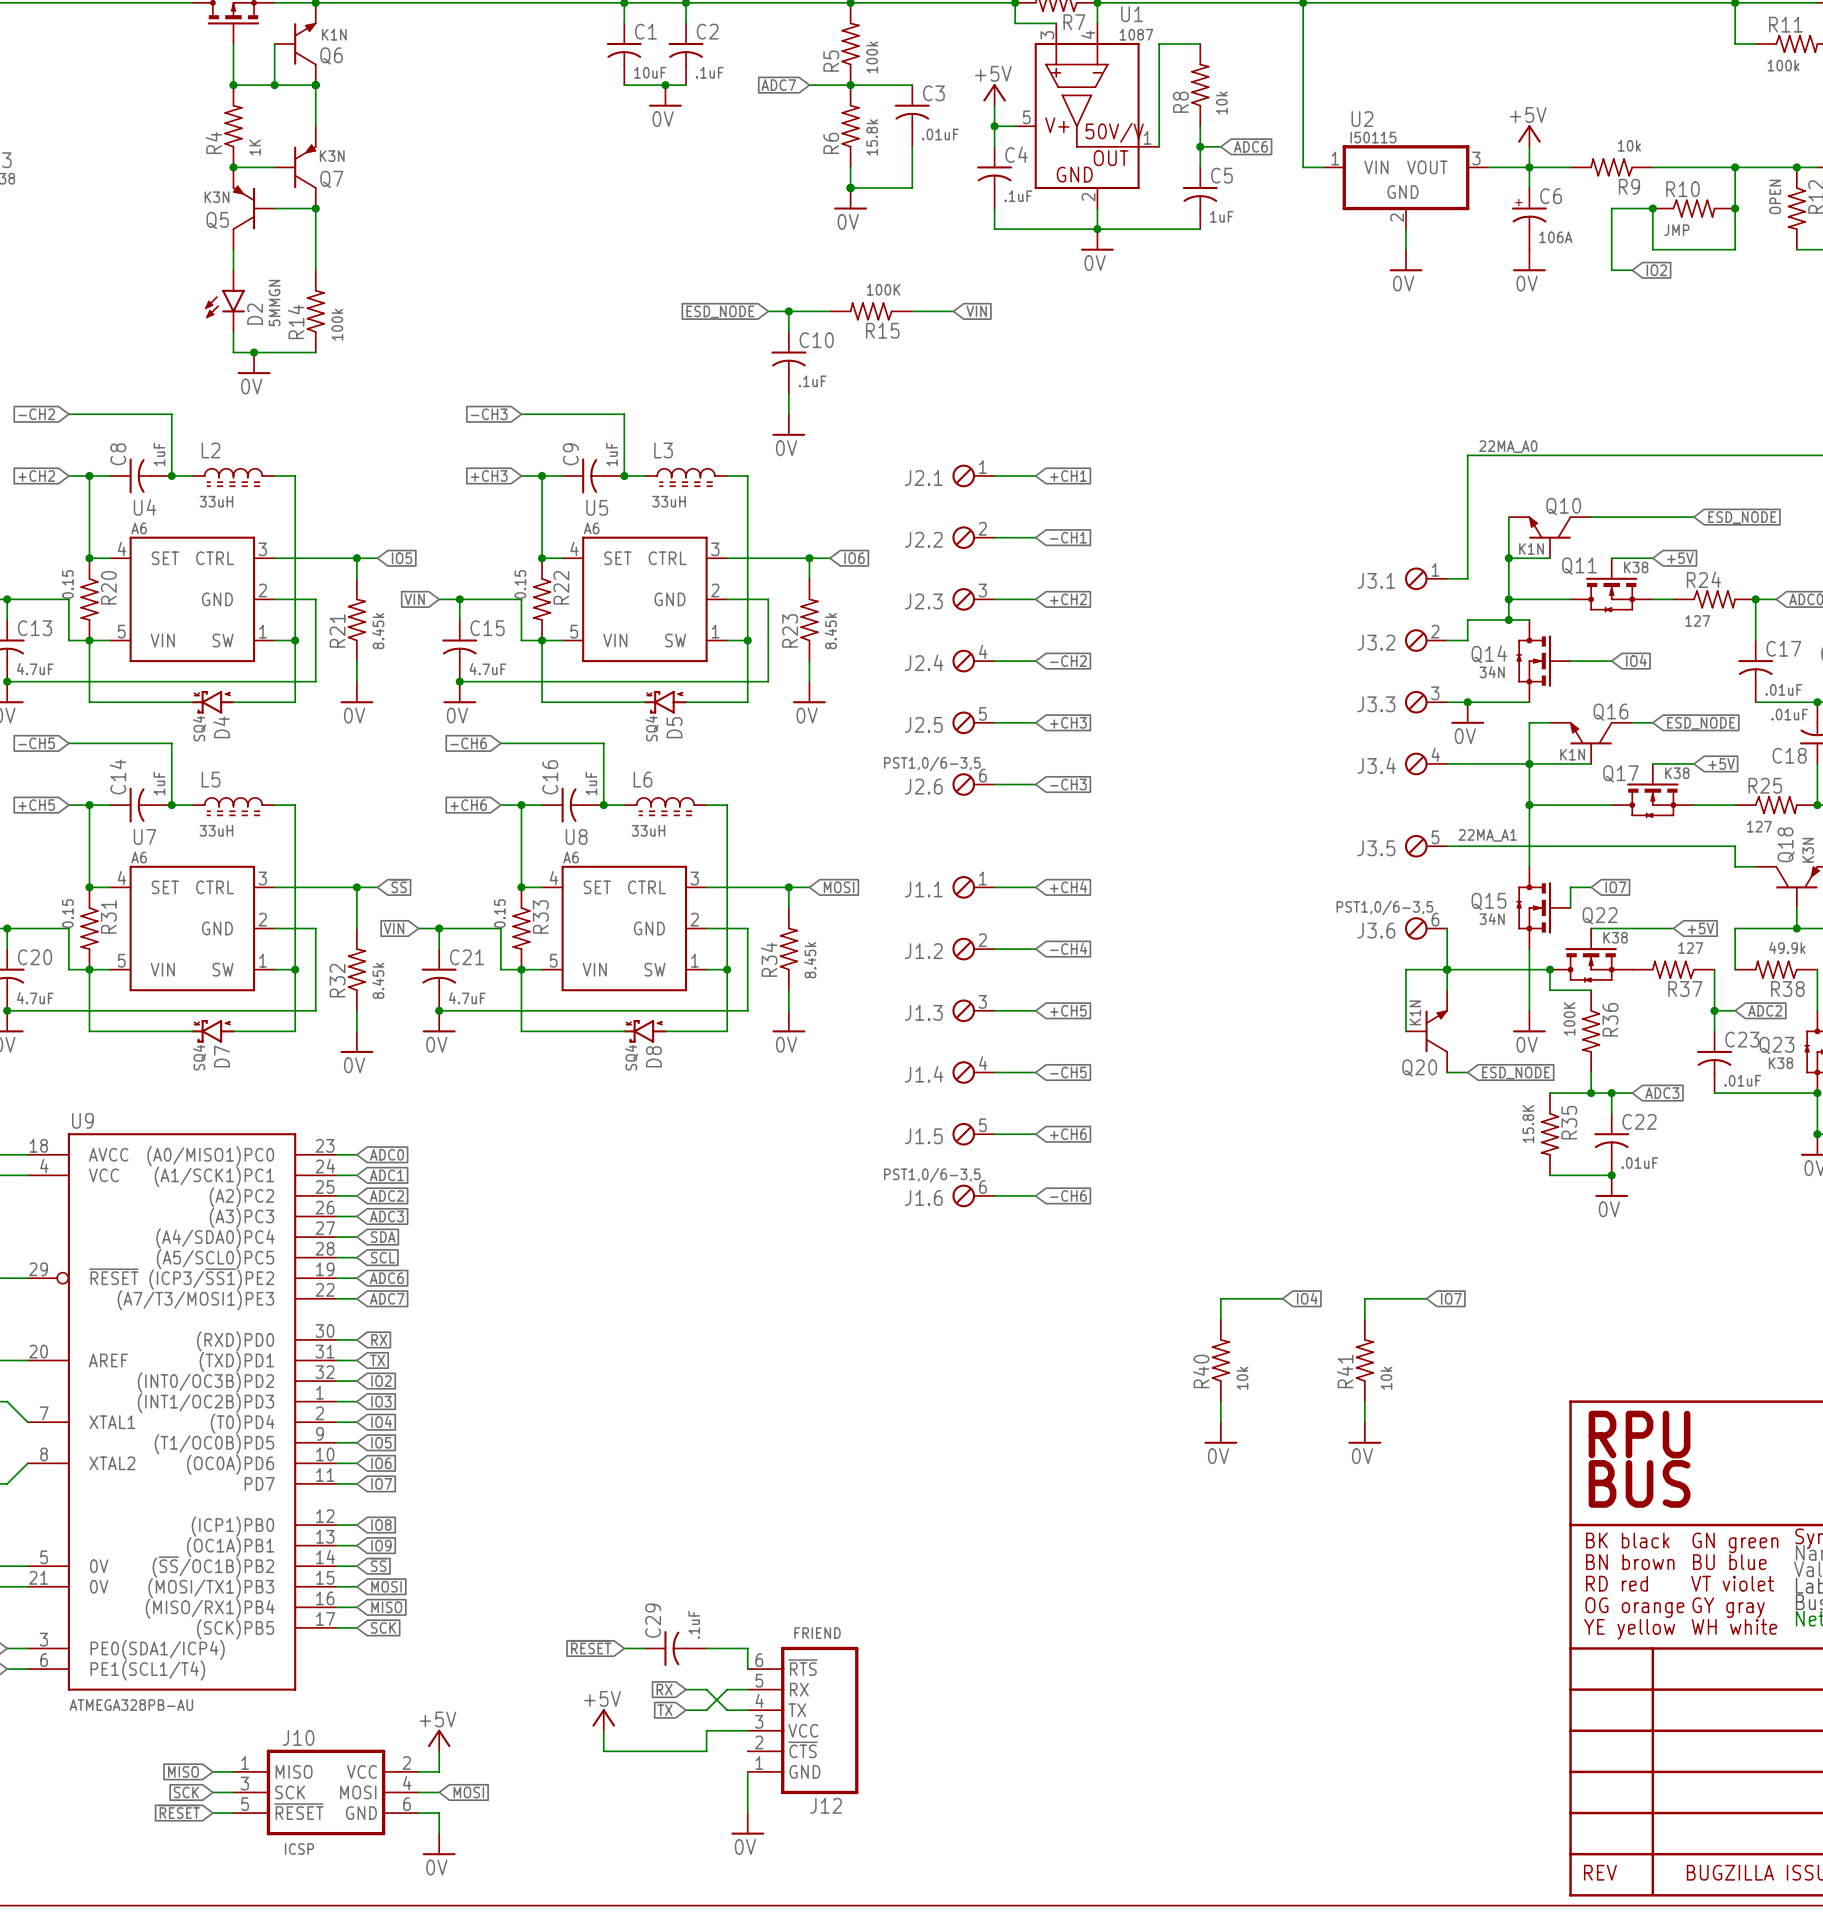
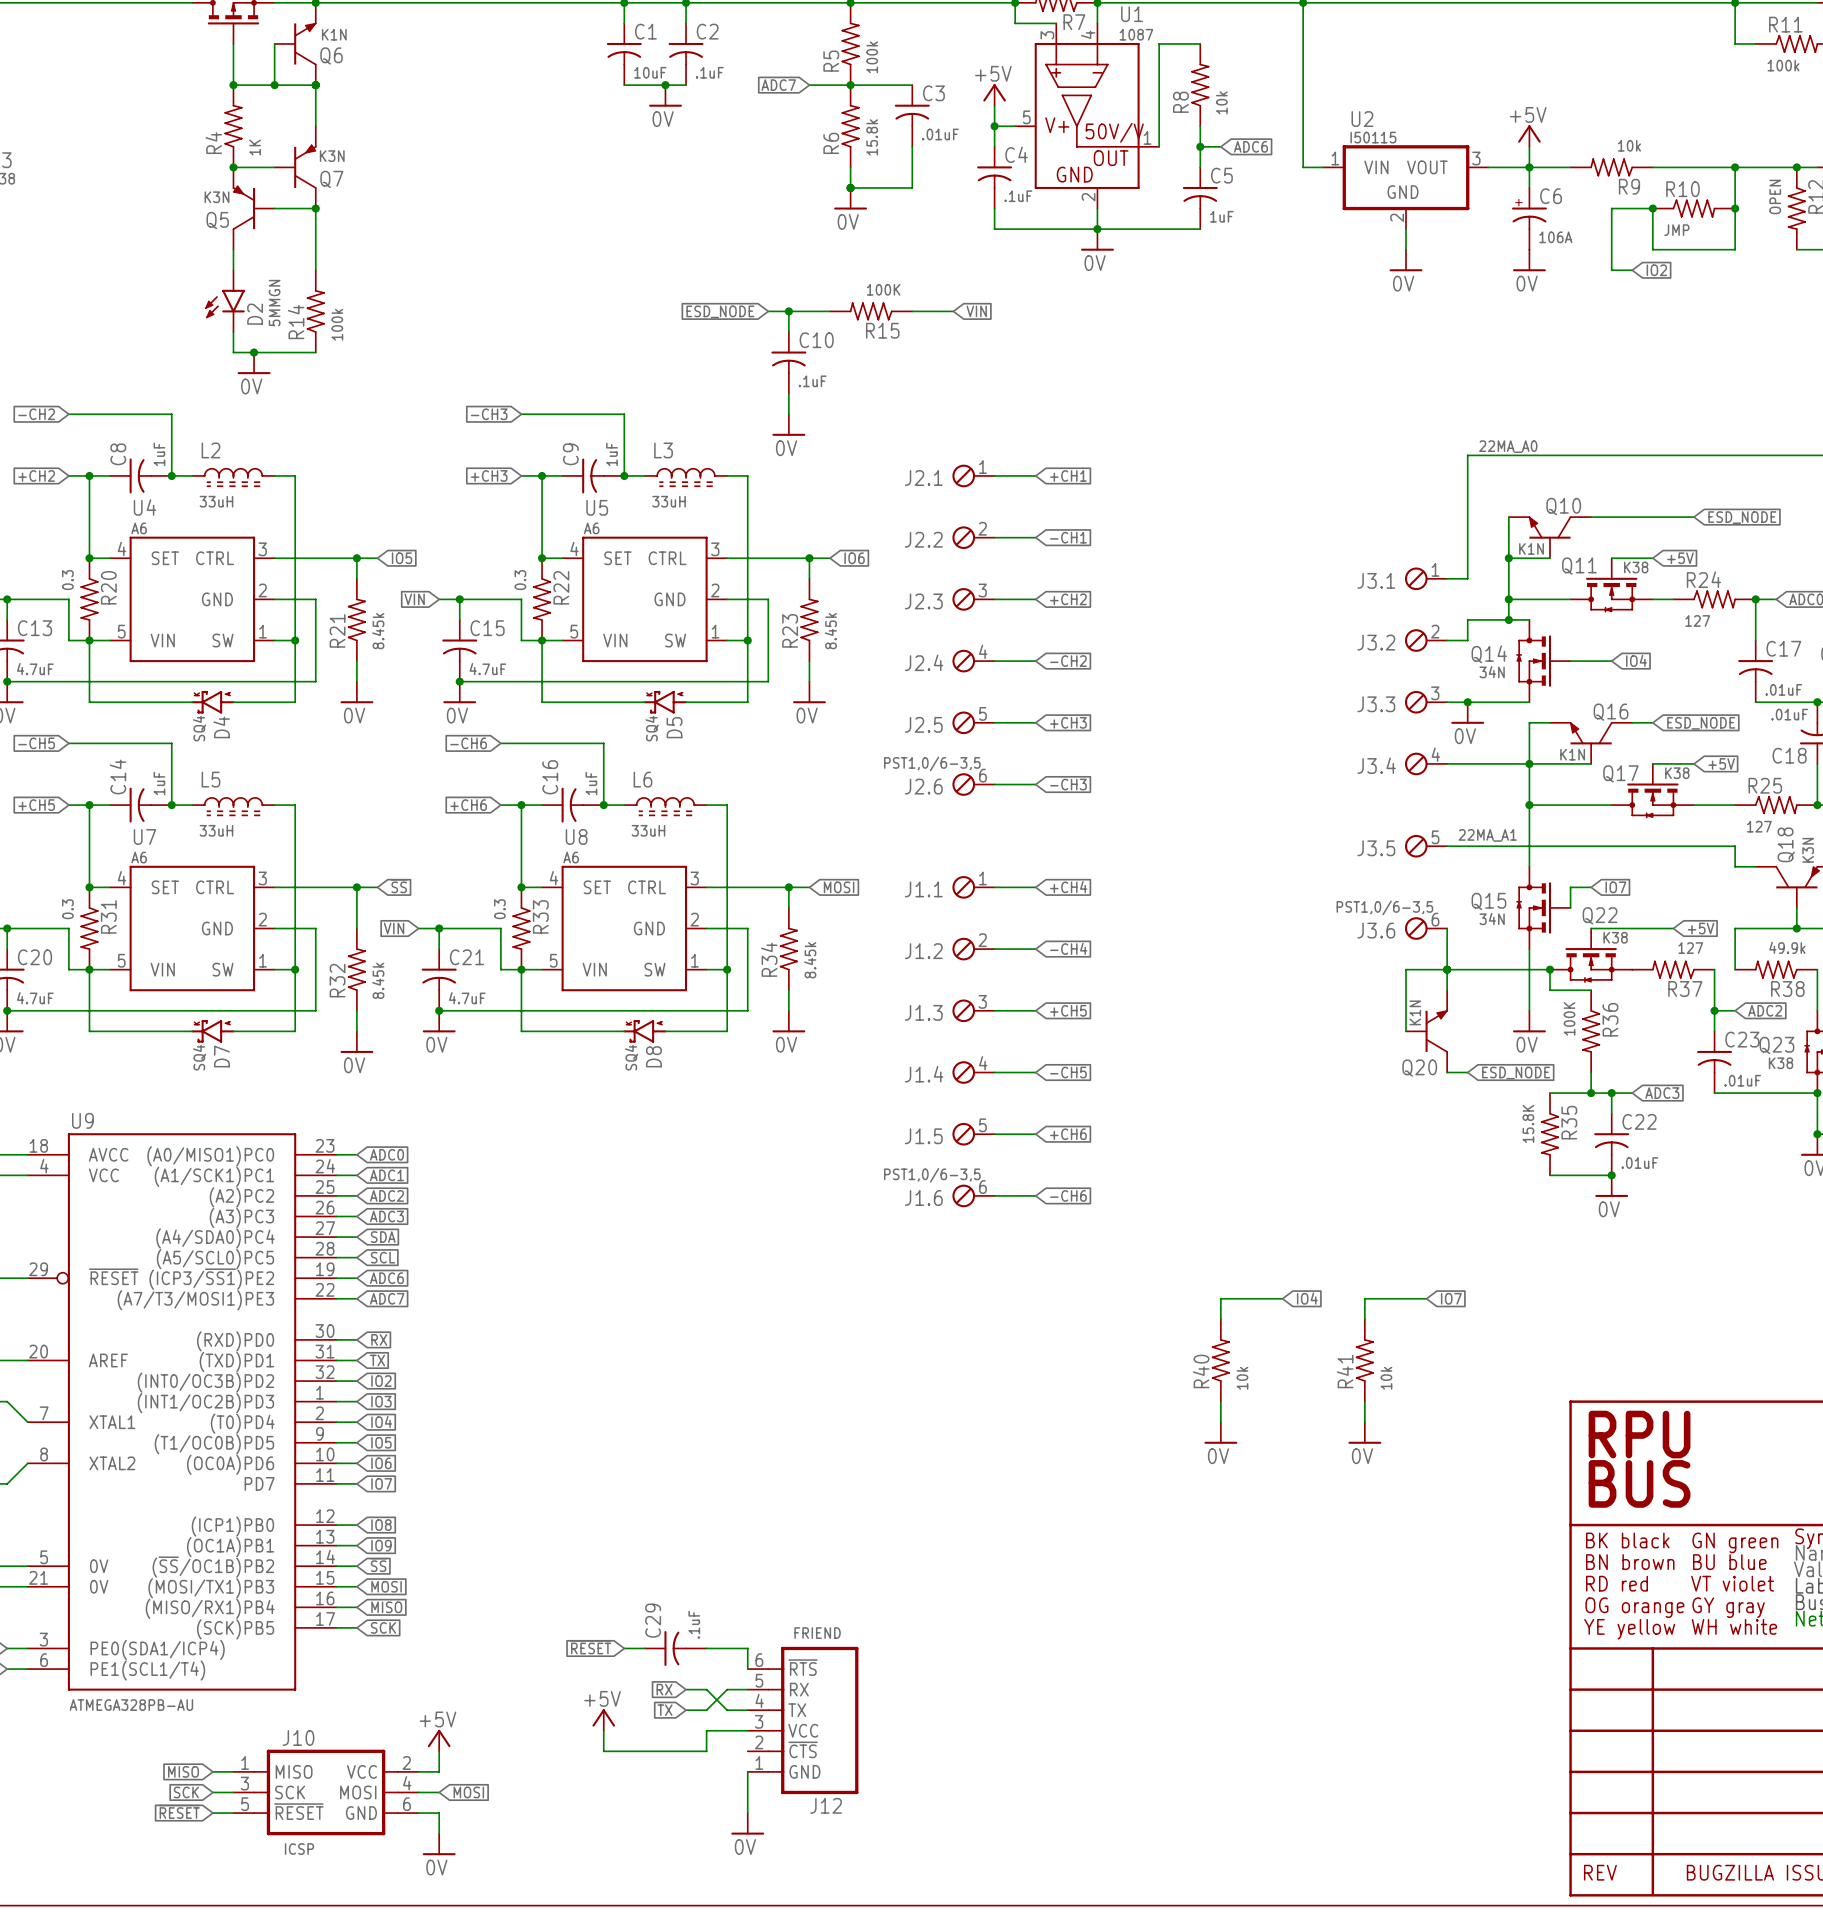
R20 value: 0.15 (67, 584) -> 0.3 (67, 580)
R22 value: 0.15 (520, 584) -> 0.3 (520, 580)
R31 value: 0.15 (67, 913) -> 0.3 (67, 909)
R33 value: 0.15 (499, 913) -> 0.3 (499, 909)

